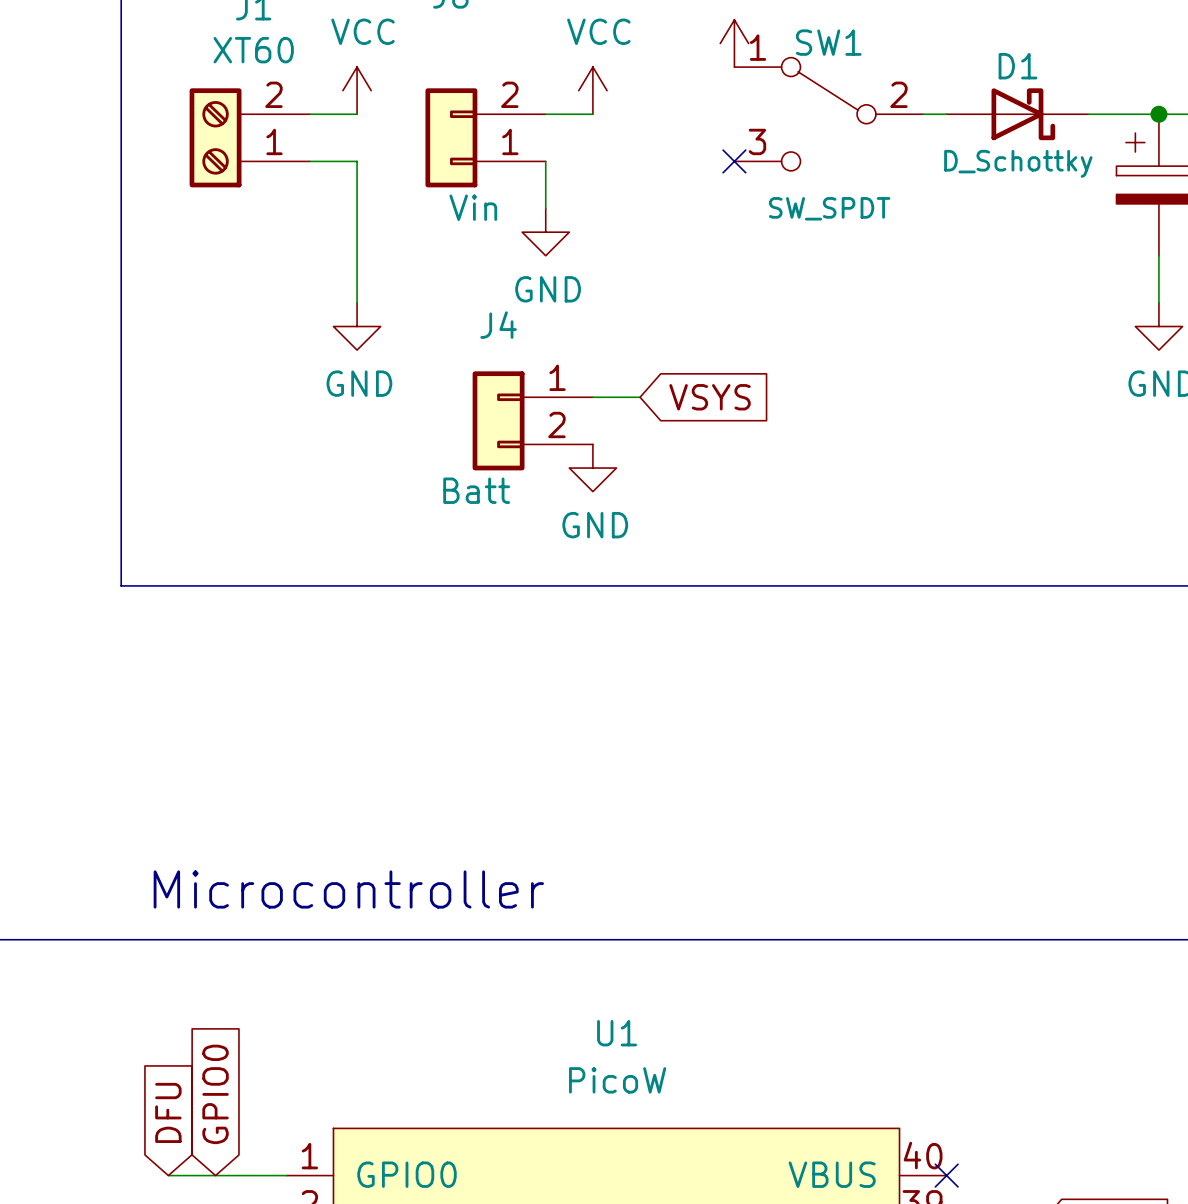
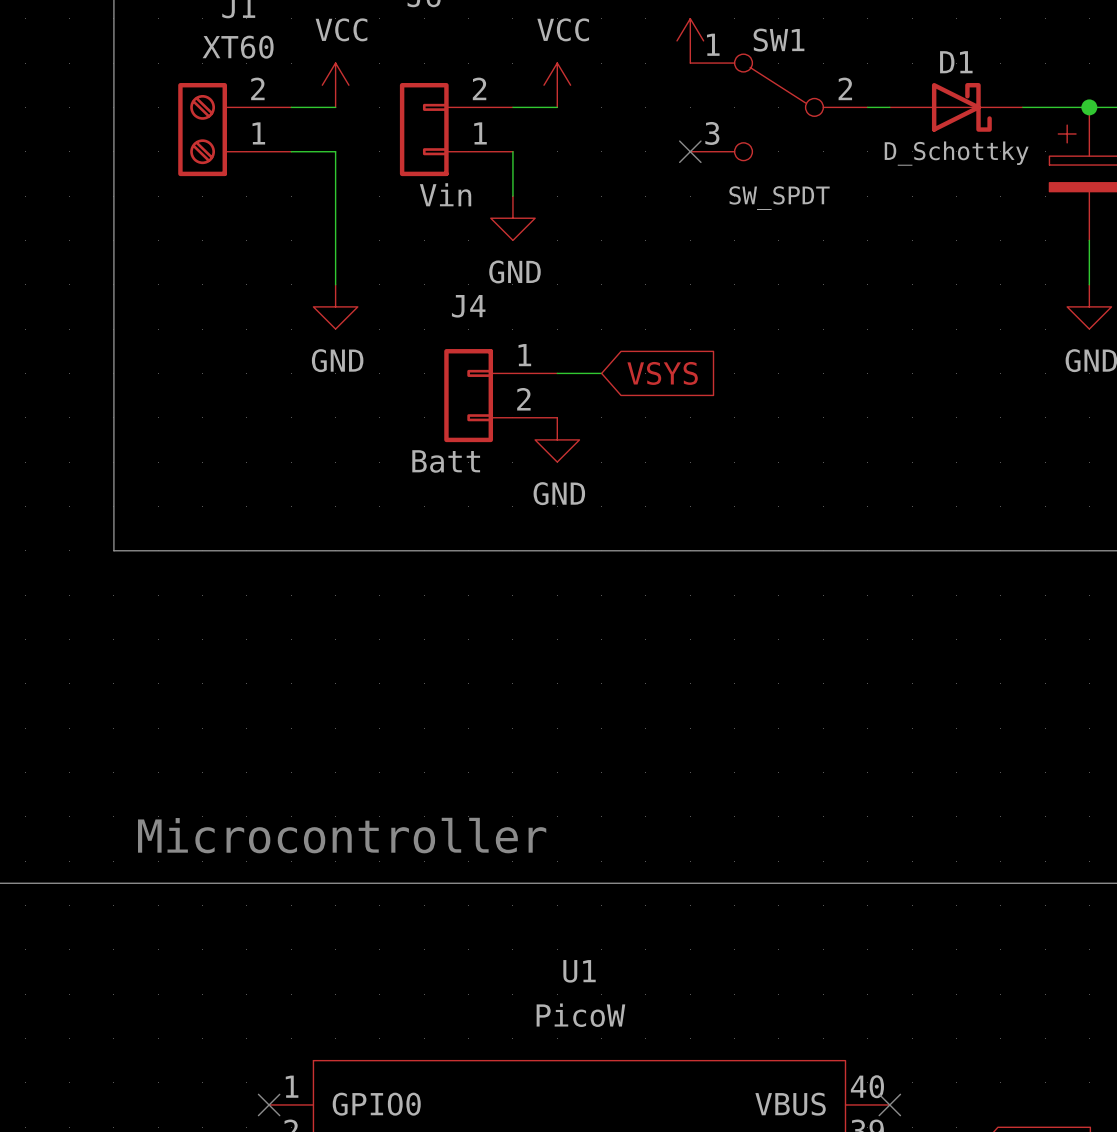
global label: GPIO0 (215, 1094) -> none
global label: DFU (168, 1112) -> none
wire: (168, 1175) (286, 1175) -> none
no-connect mark: none -> (269, 1104)

